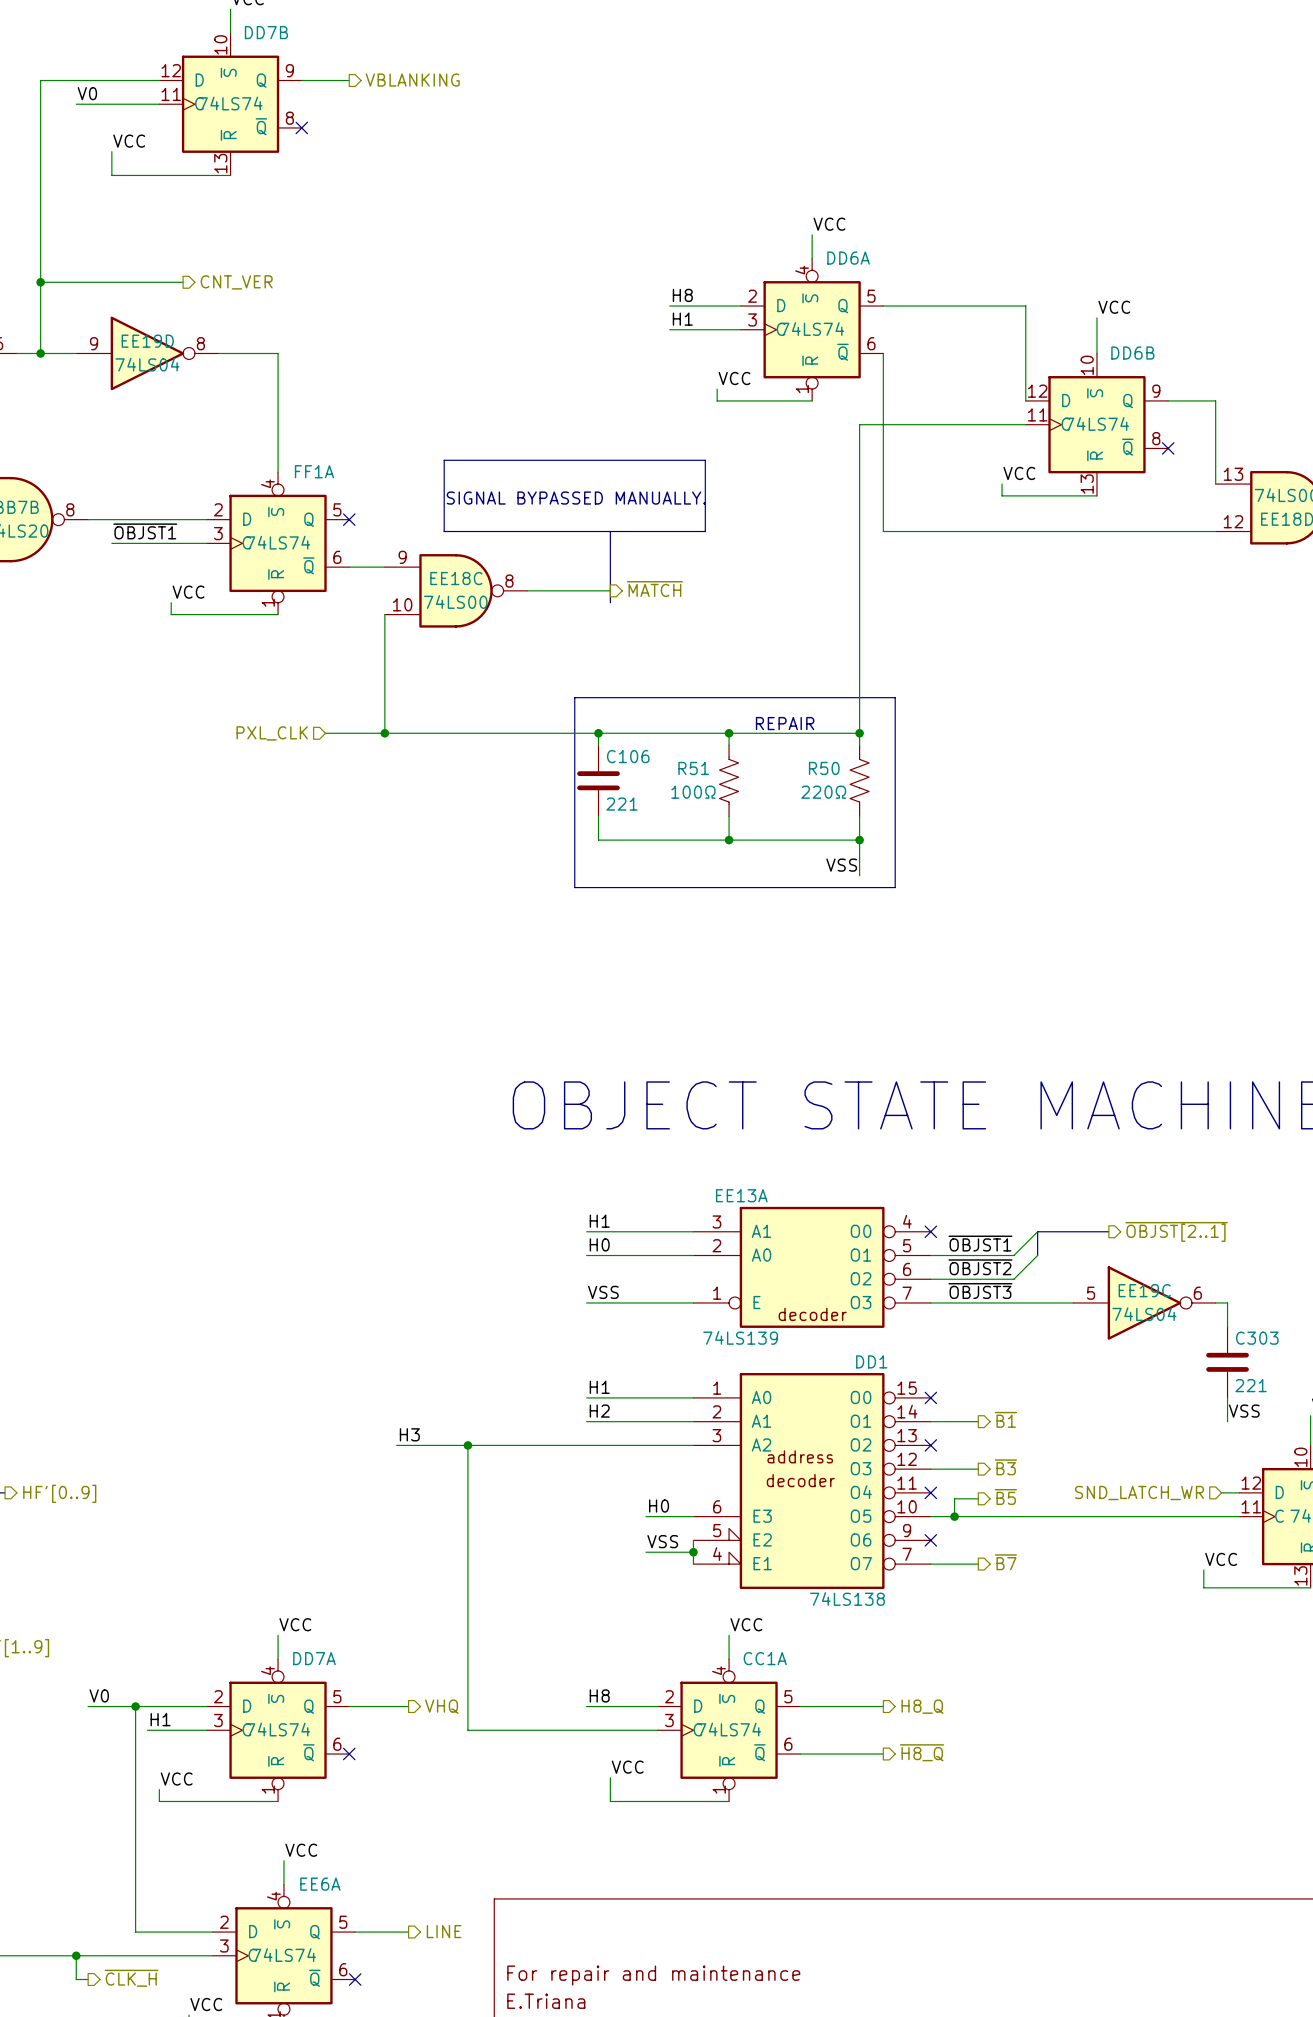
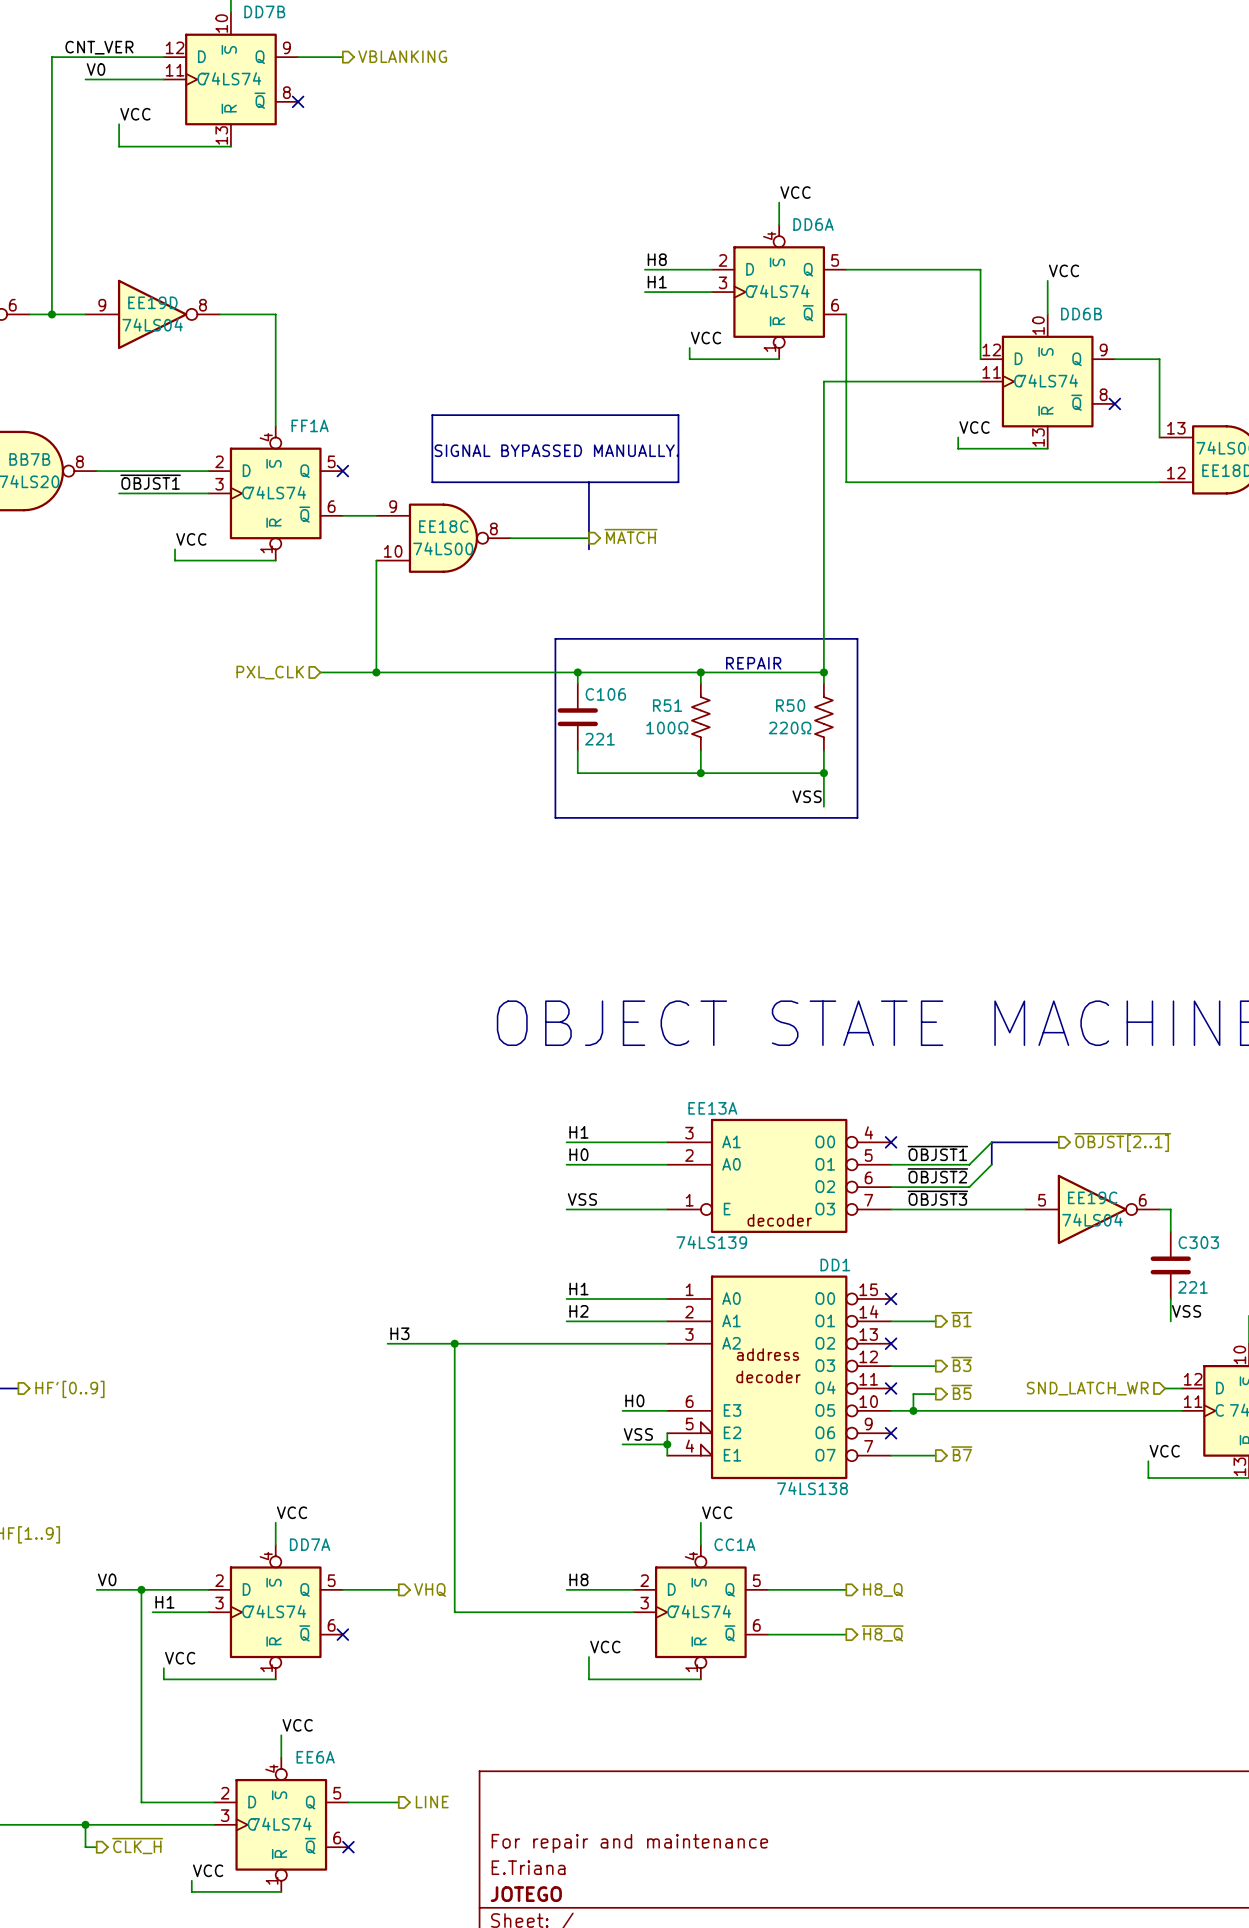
label: none -> CNT_VER (99, 47)
wire: (40, 282) (183, 282) -> none
junction: (40, 282) -> none
hierarchical label: CNT_VER (236, 282) -> none

